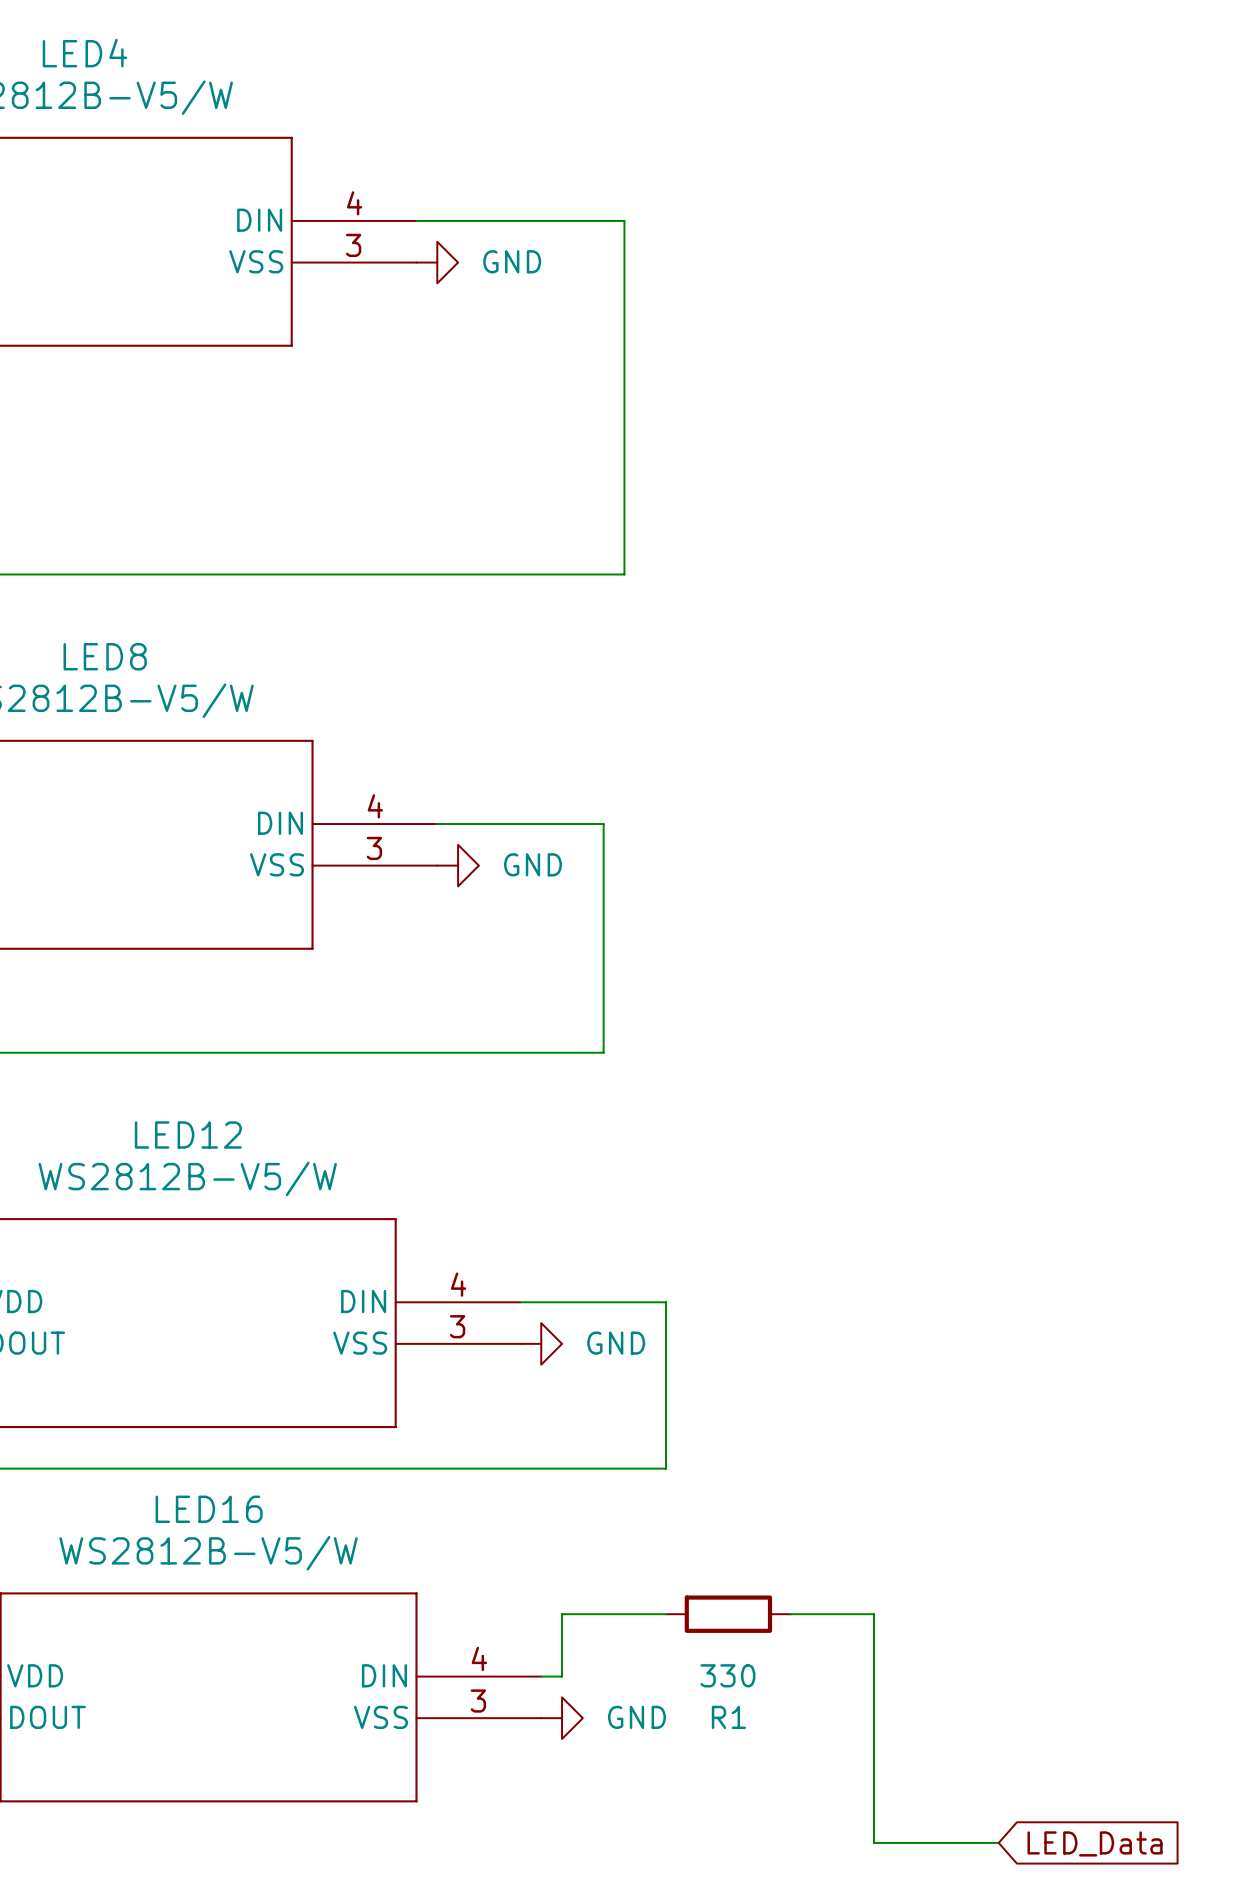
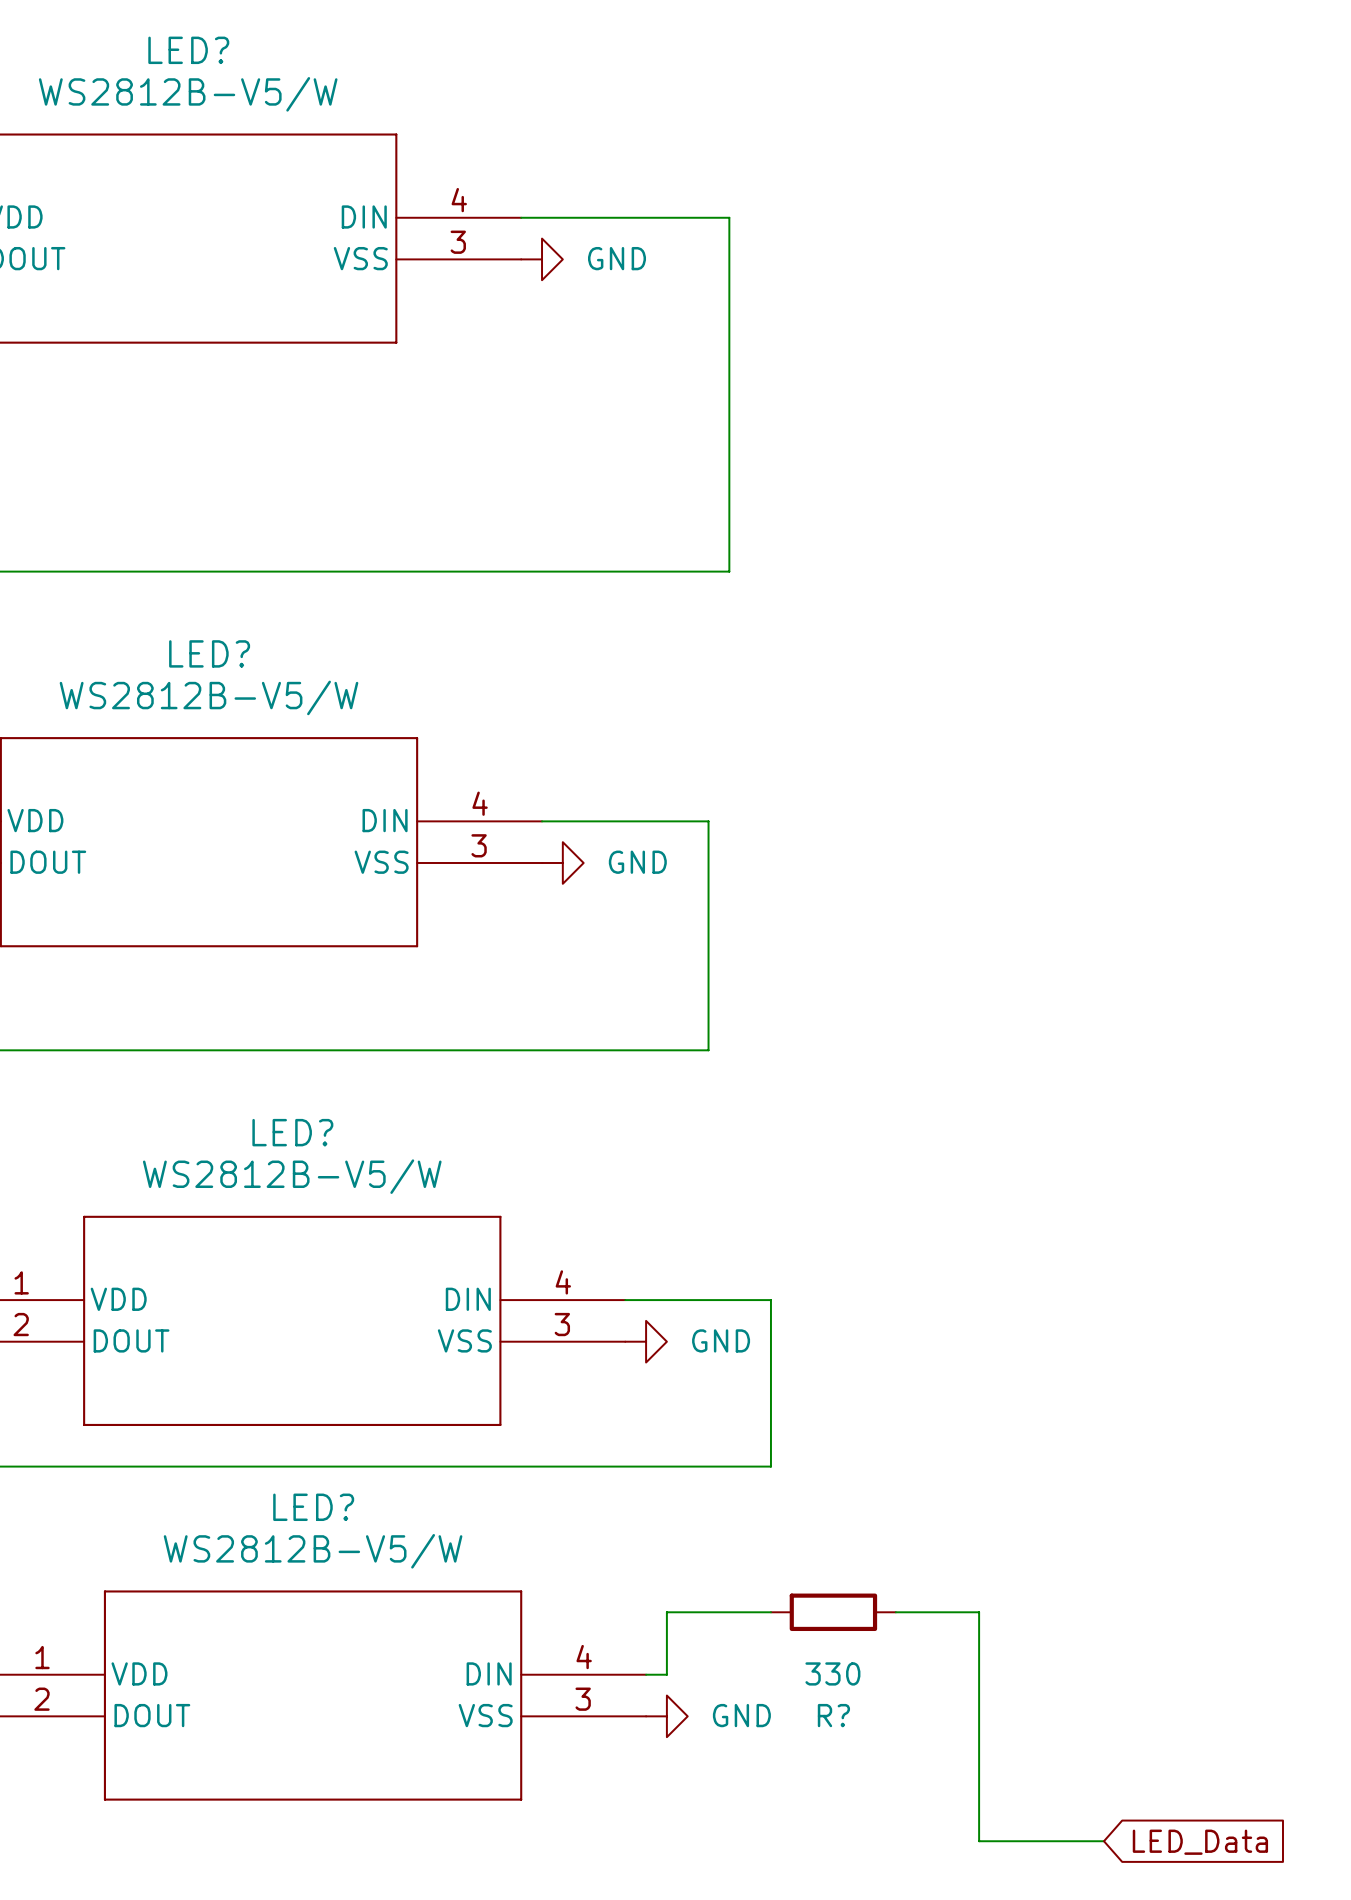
LED4 name: LED4 (84, 53) -> LED? (188, 50)
LED8 name: LED8 (105, 656) -> LED? (209, 653)
LED12 name: LED12 (188, 1134) -> LED? (292, 1132)
LED16 name: LED16 (209, 1509) -> LED? (313, 1507)
R1 name: R1 (728, 1717) -> R? (833, 1715)

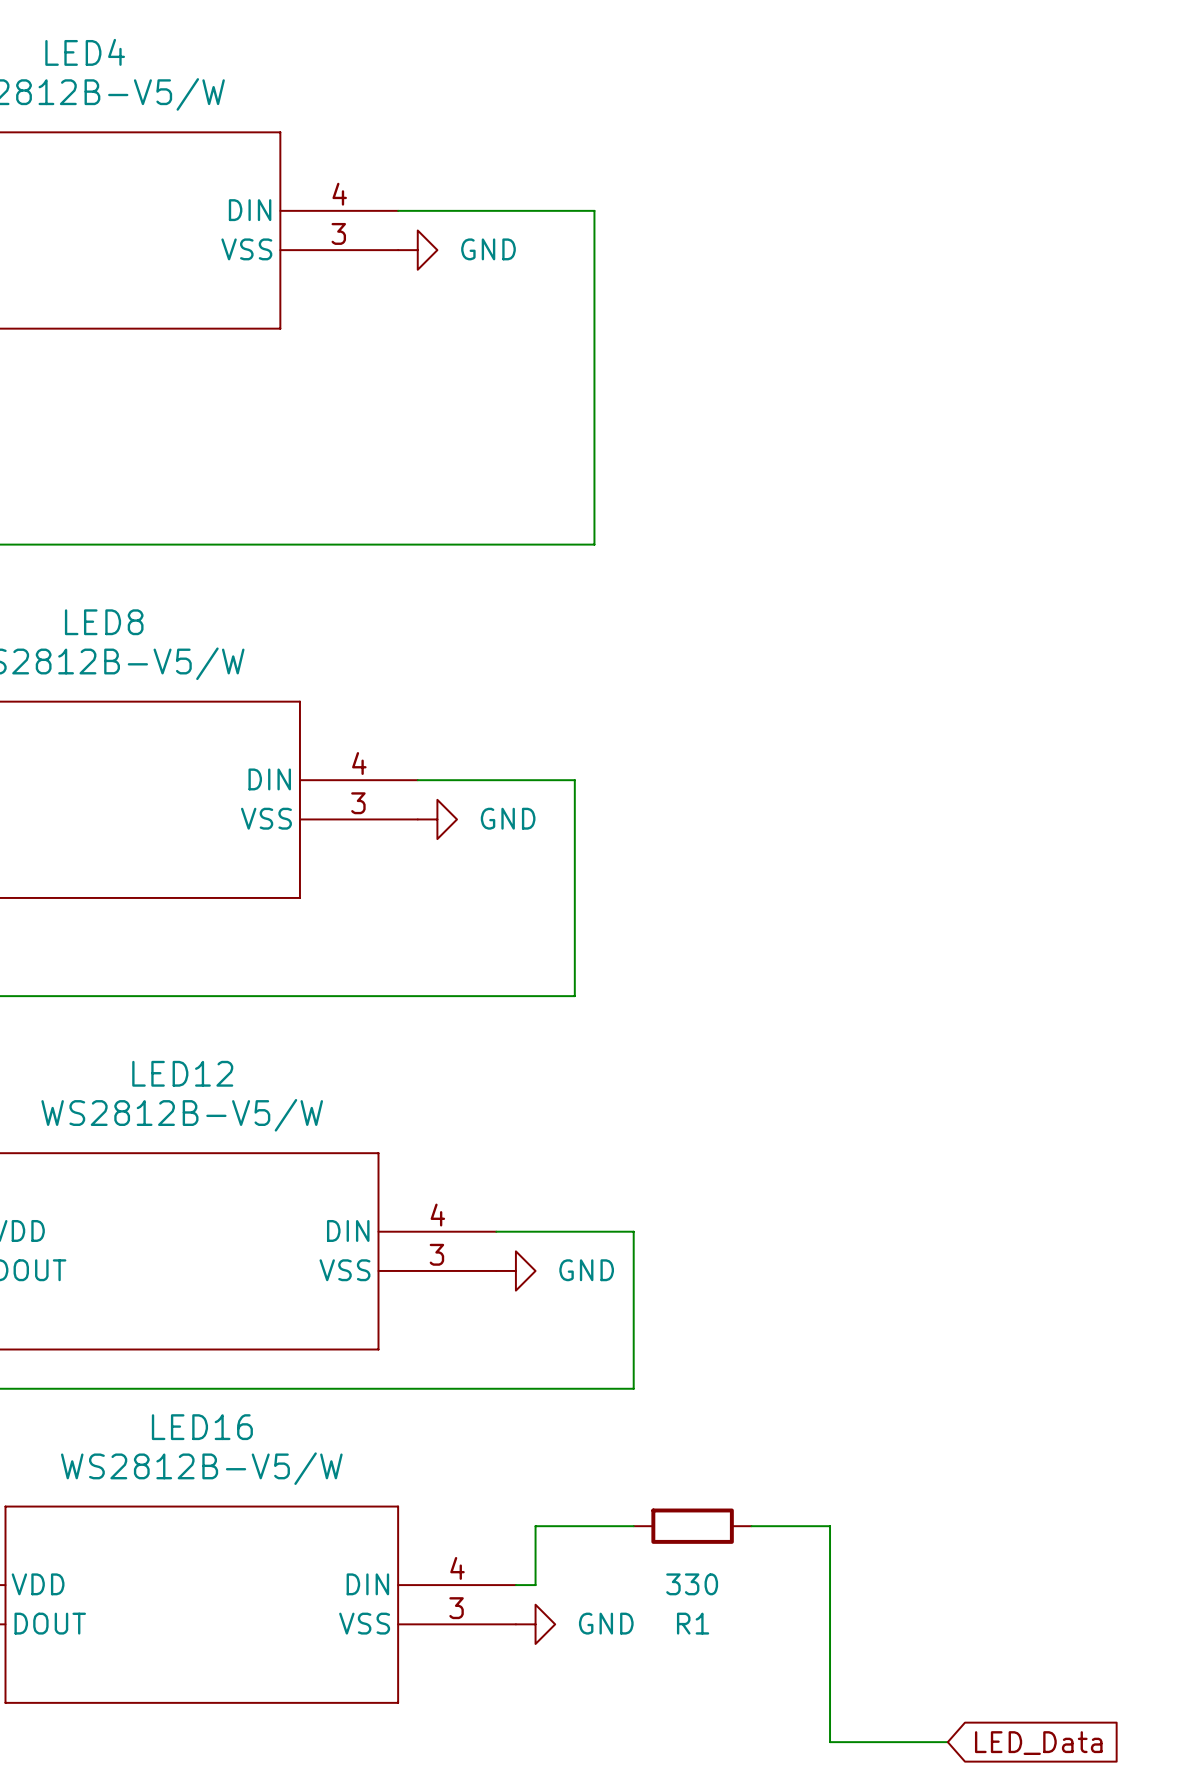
LED? name: LED? (188, 50) -> LED4 (85, 52)
LED? name: LED? (209, 653) -> LED8 (104, 622)
LED? name: LED? (292, 1132) -> LED12 (182, 1073)
LED? name: LED? (313, 1507) -> LED16 (202, 1427)
R? name: R? (833, 1715) -> R1 (693, 1623)

